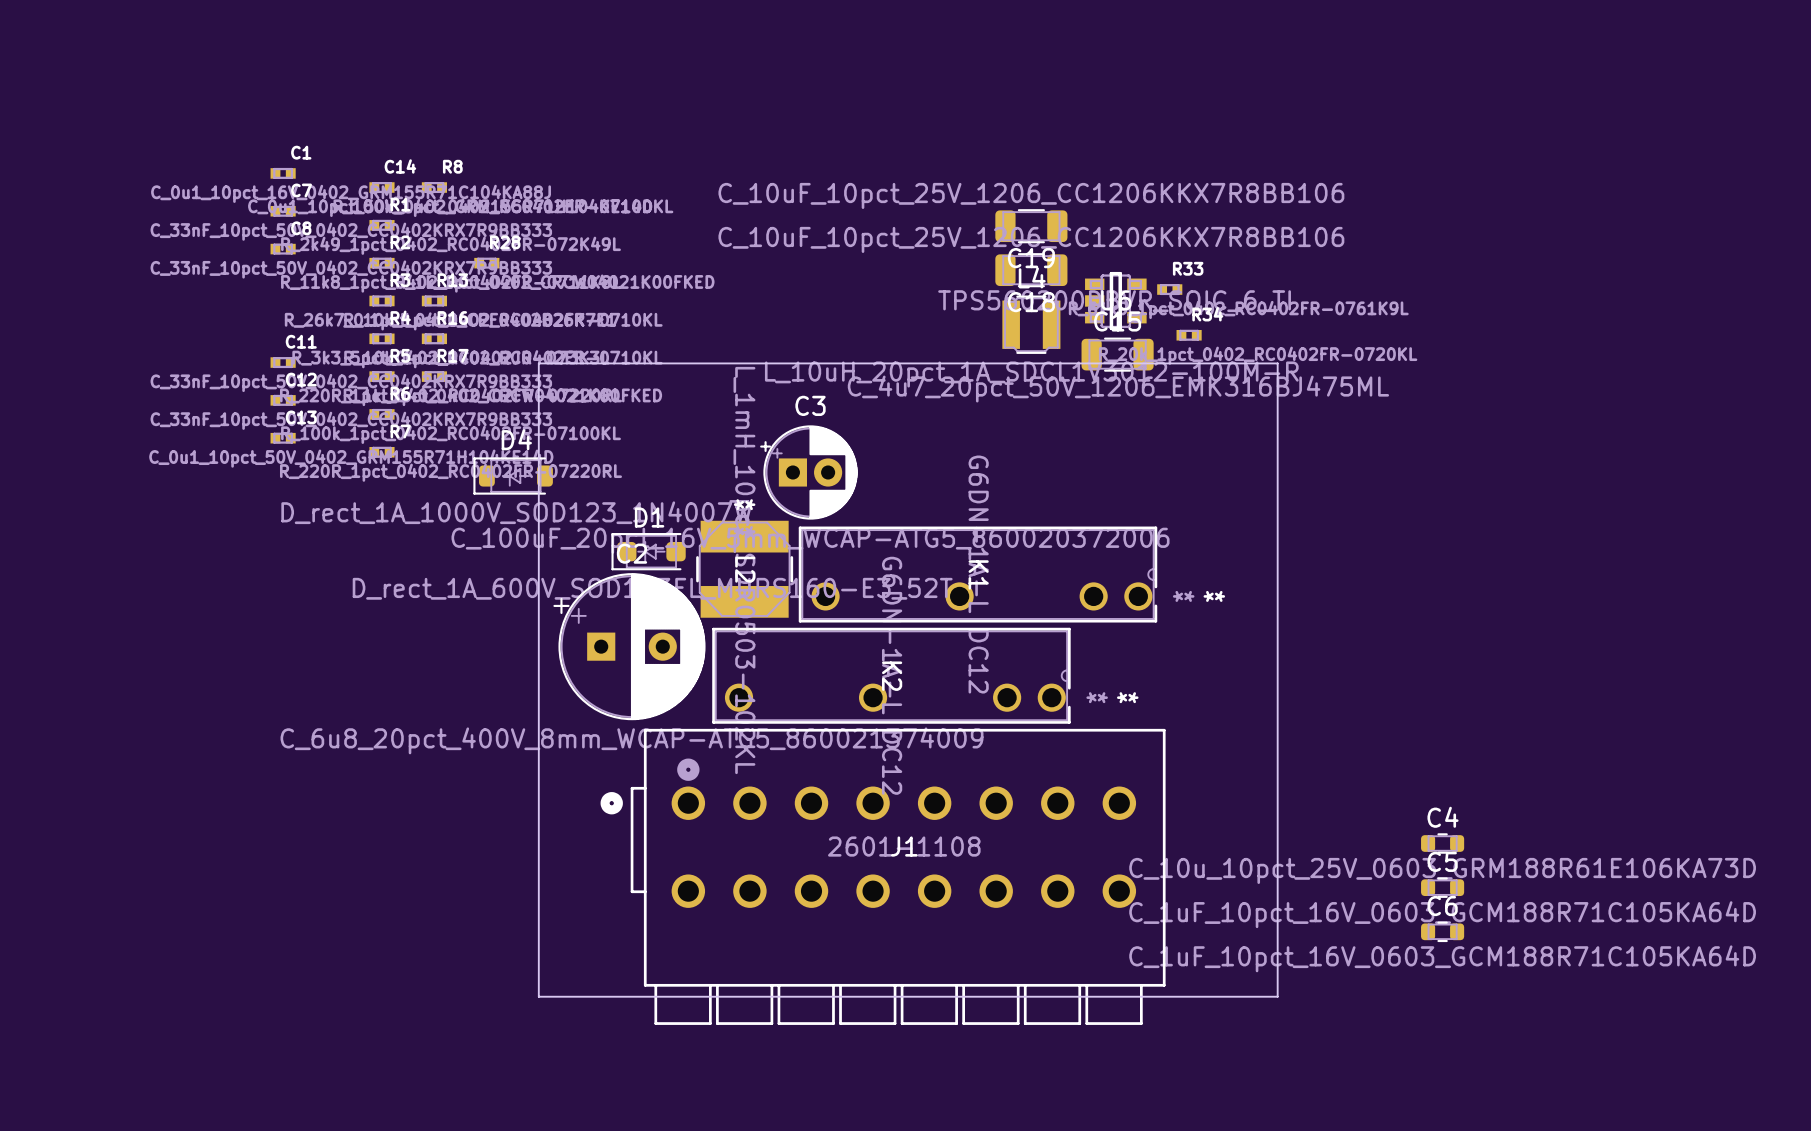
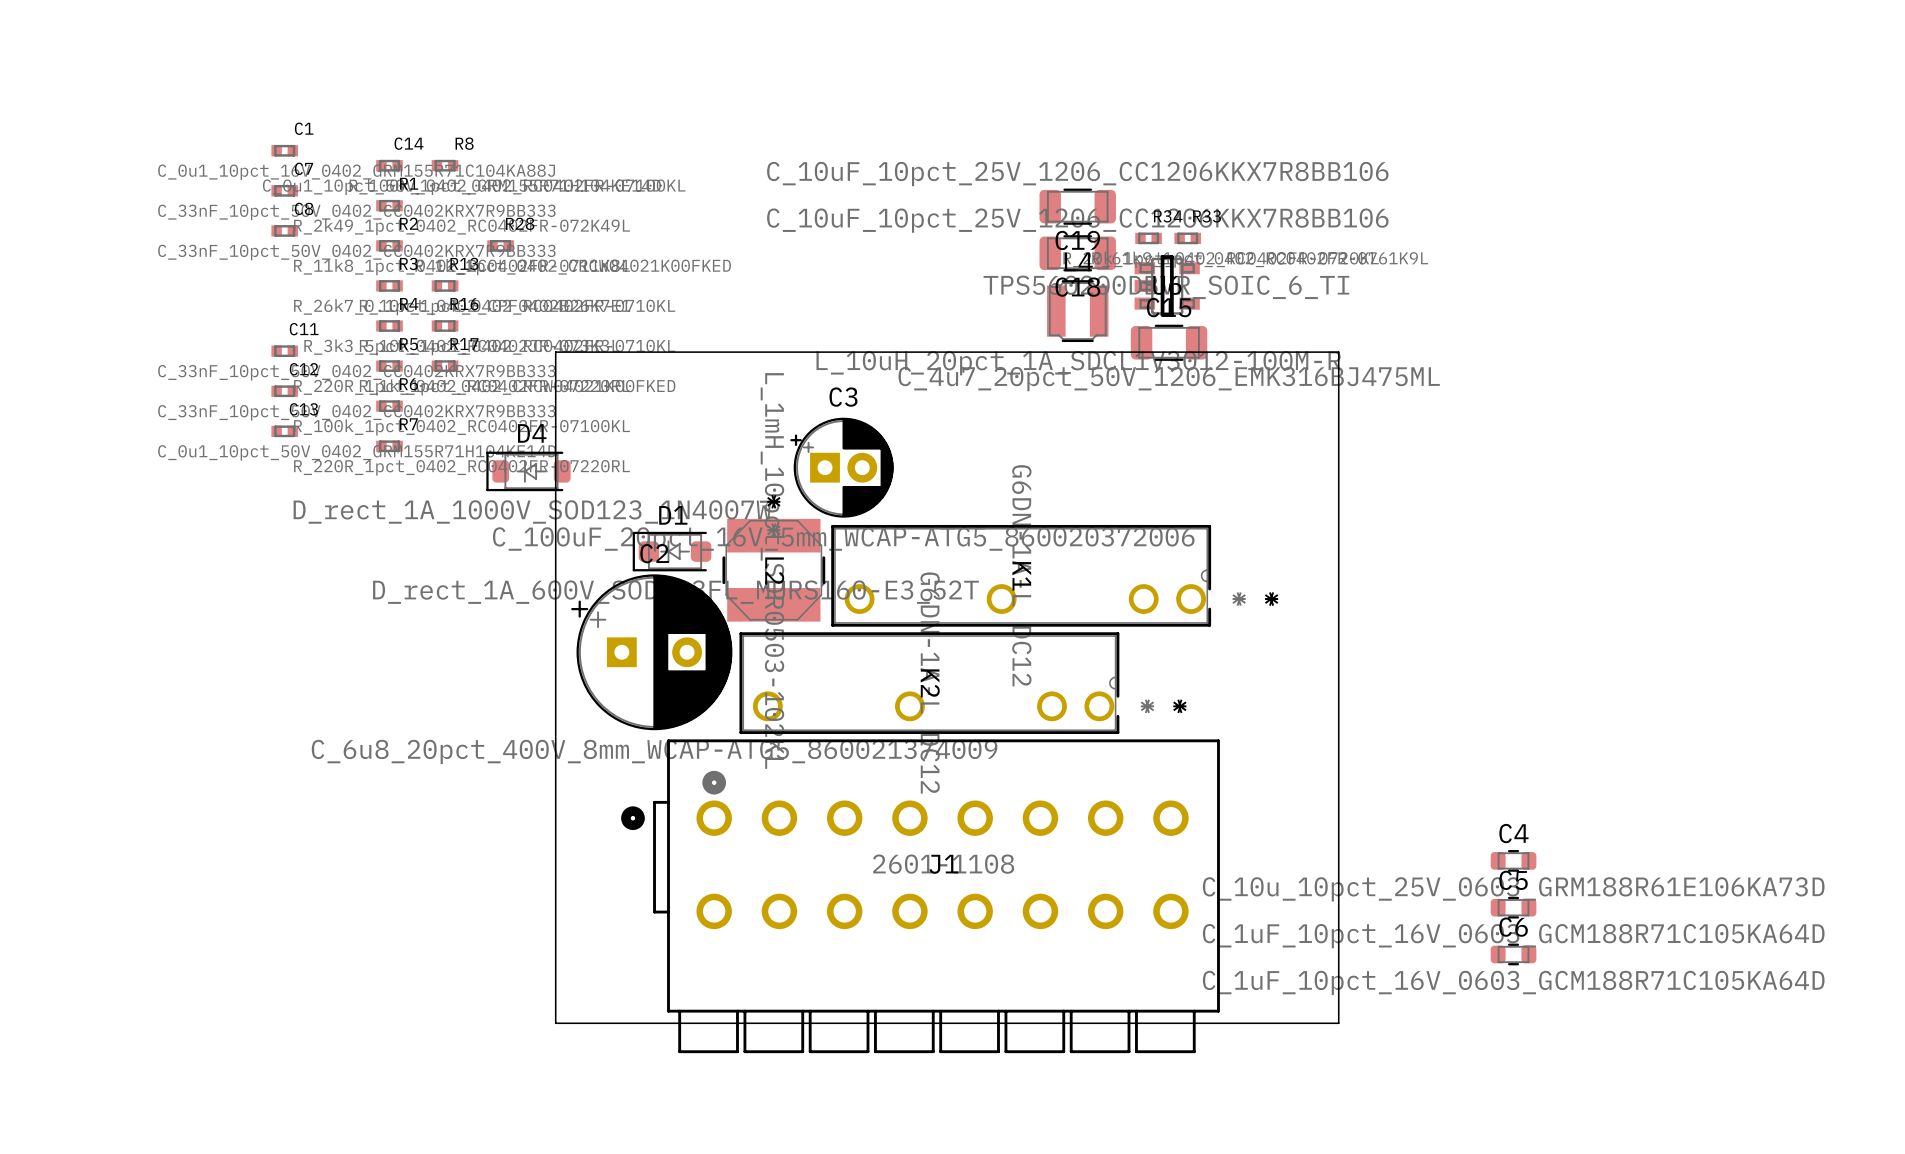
R33 position: (1169, 289) -> (1187, 238)
R34 position: (1189, 335) -> (1148, 238)

